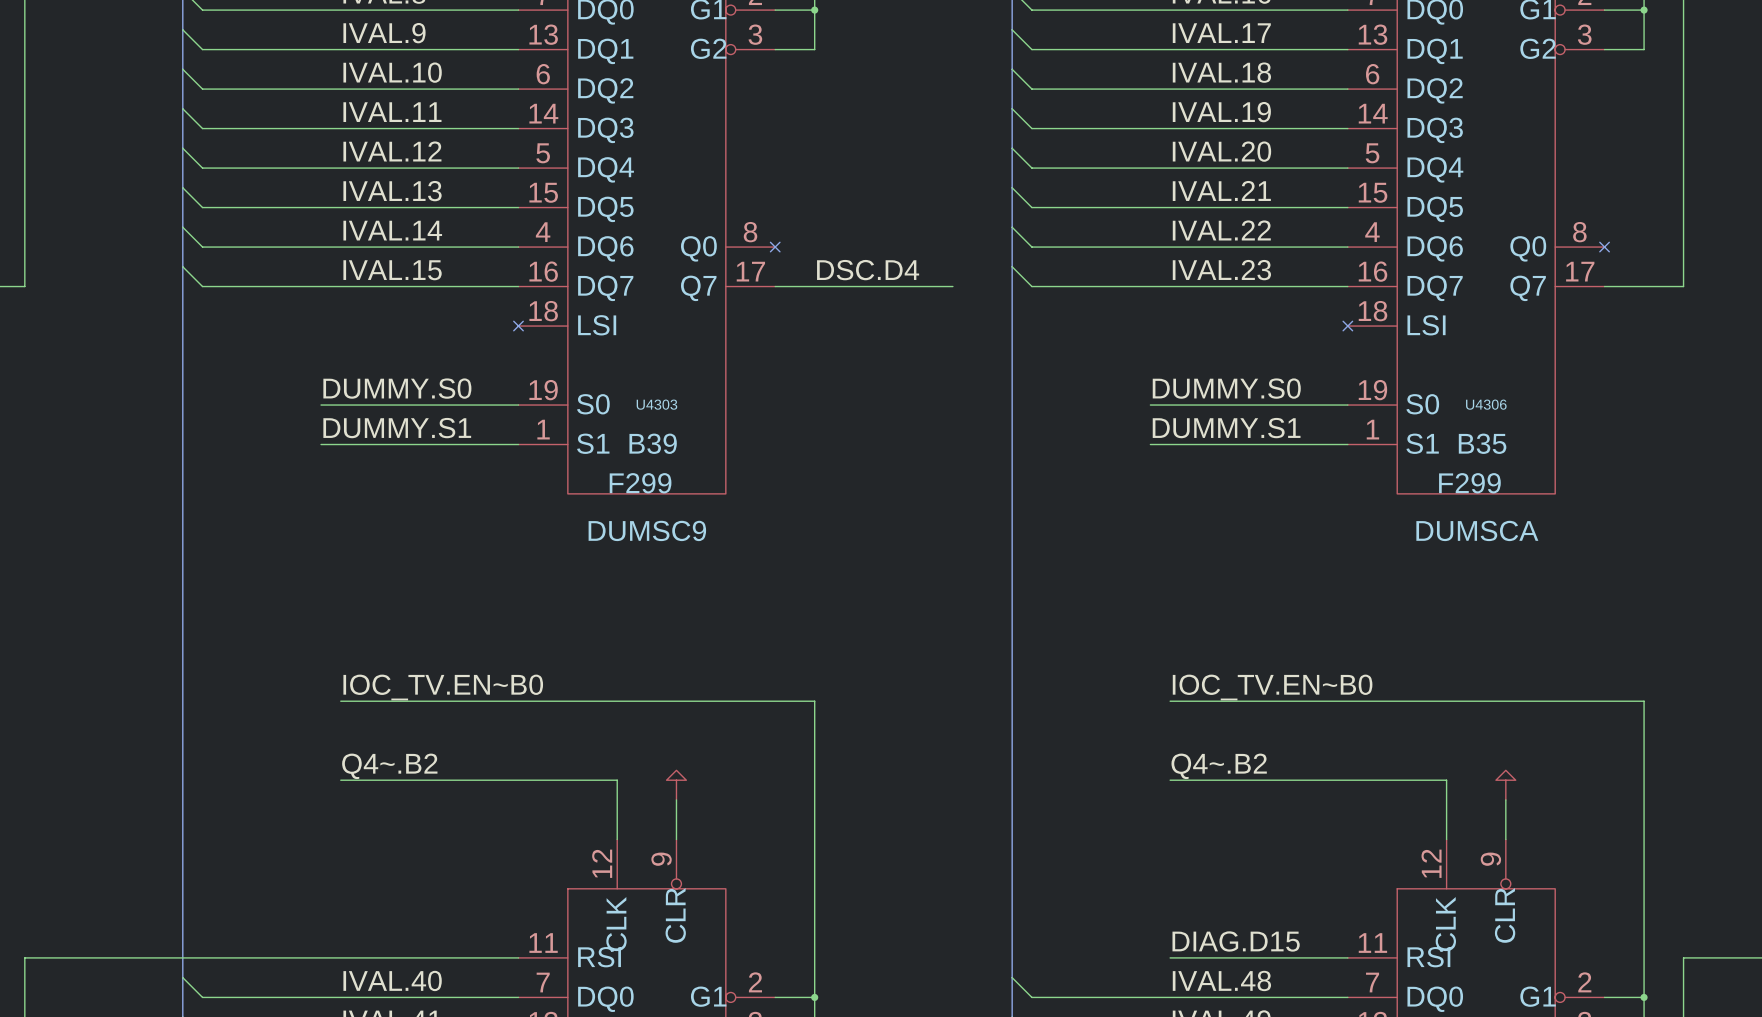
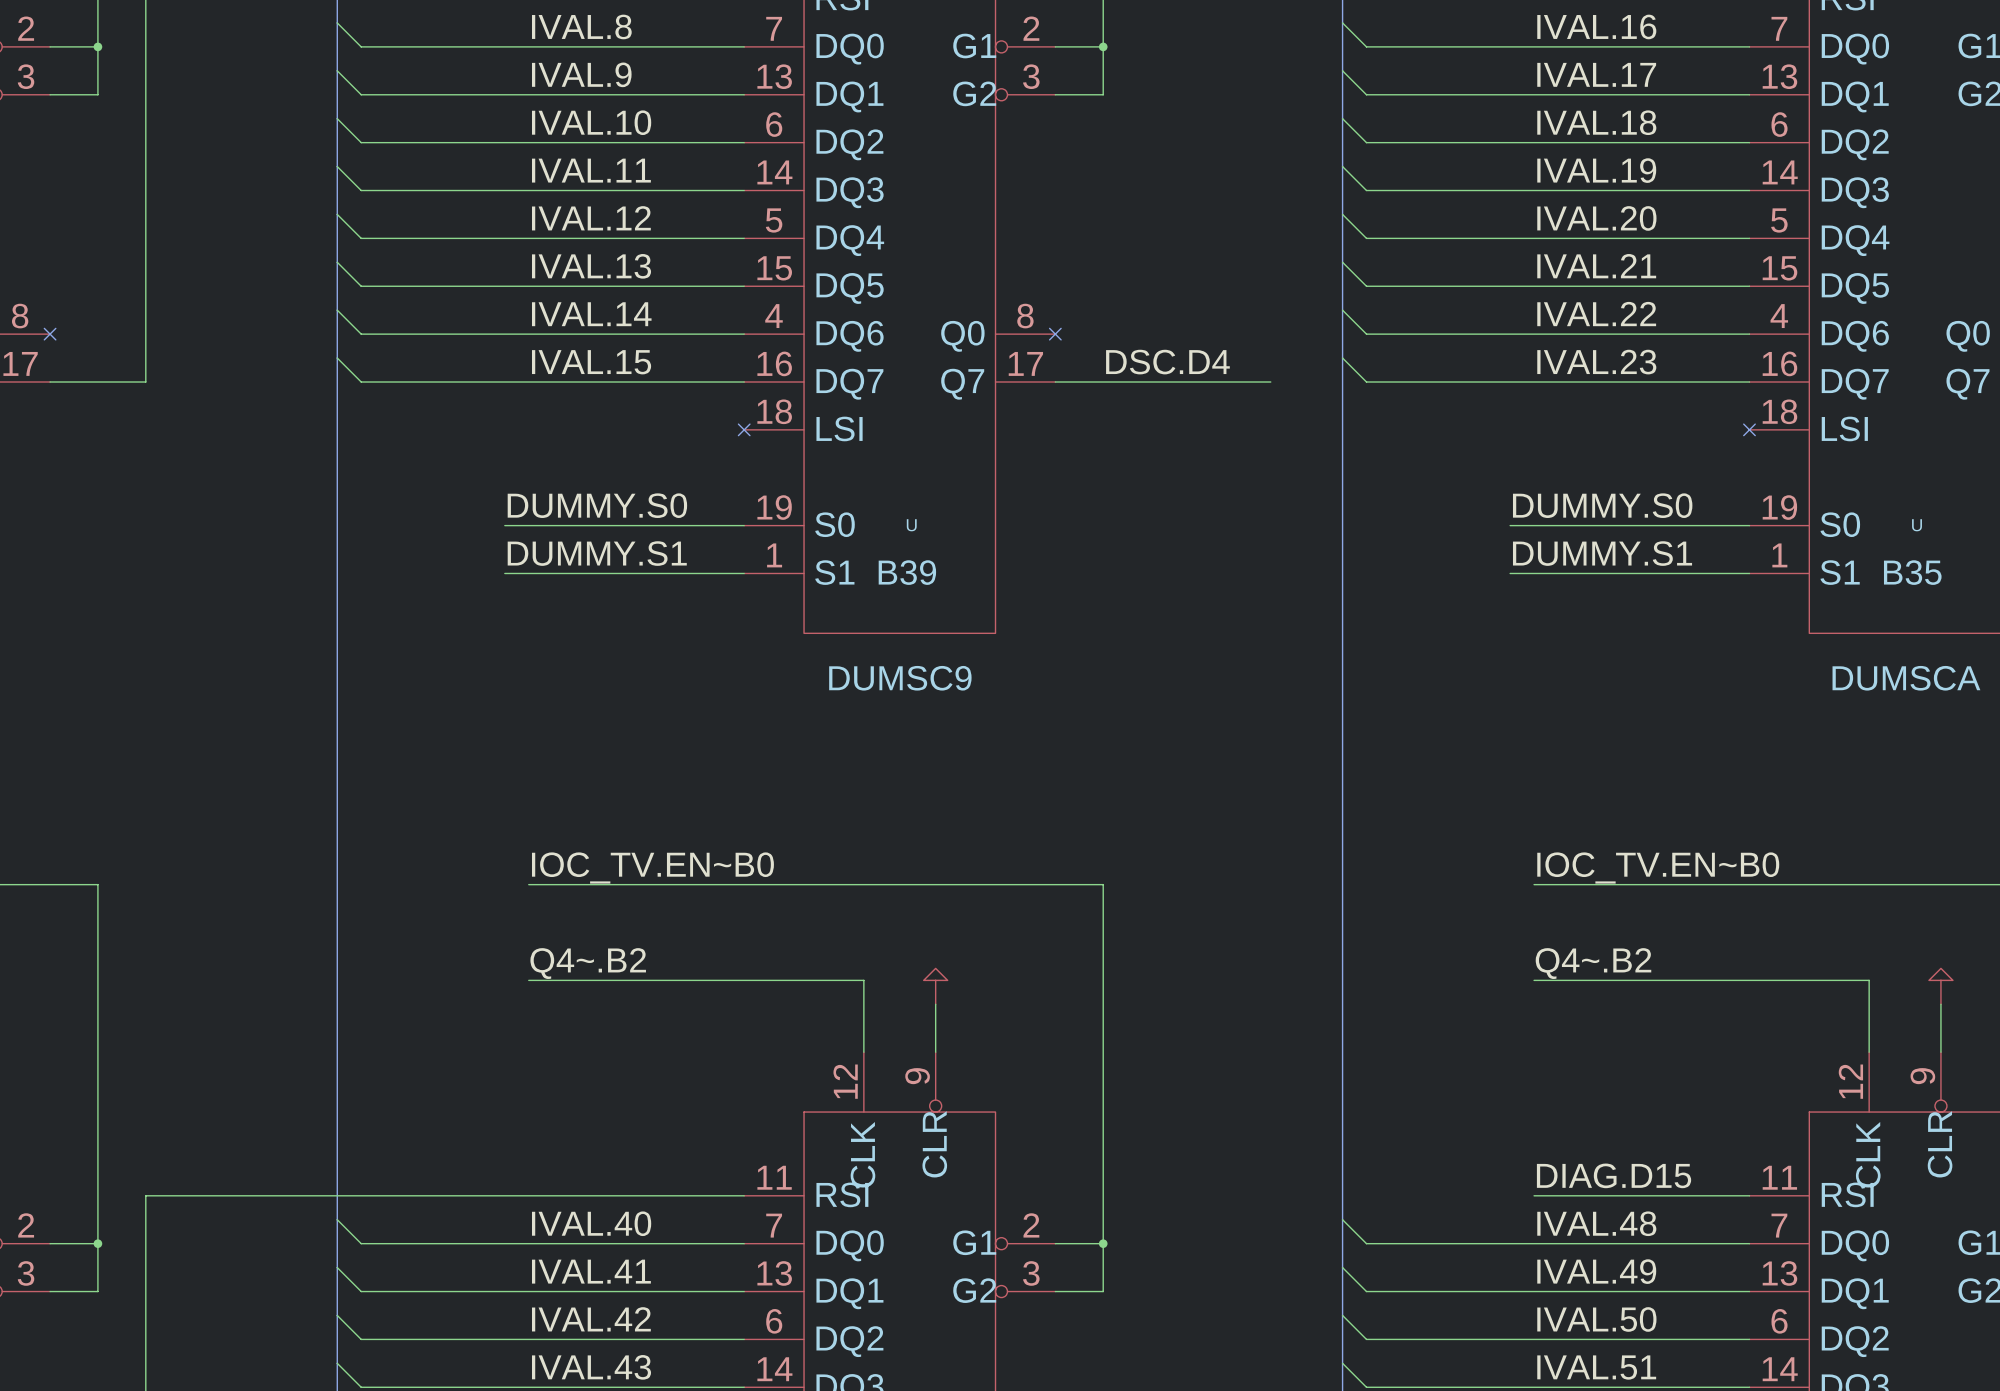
U4303 name: U4303 (656, 404) -> U (911, 525)
U4306 name: U4306 (1486, 404) -> U (1917, 525)
U4303 value: F299 (640, 483) -> none
U4306 value: F299 (1469, 483) -> none

